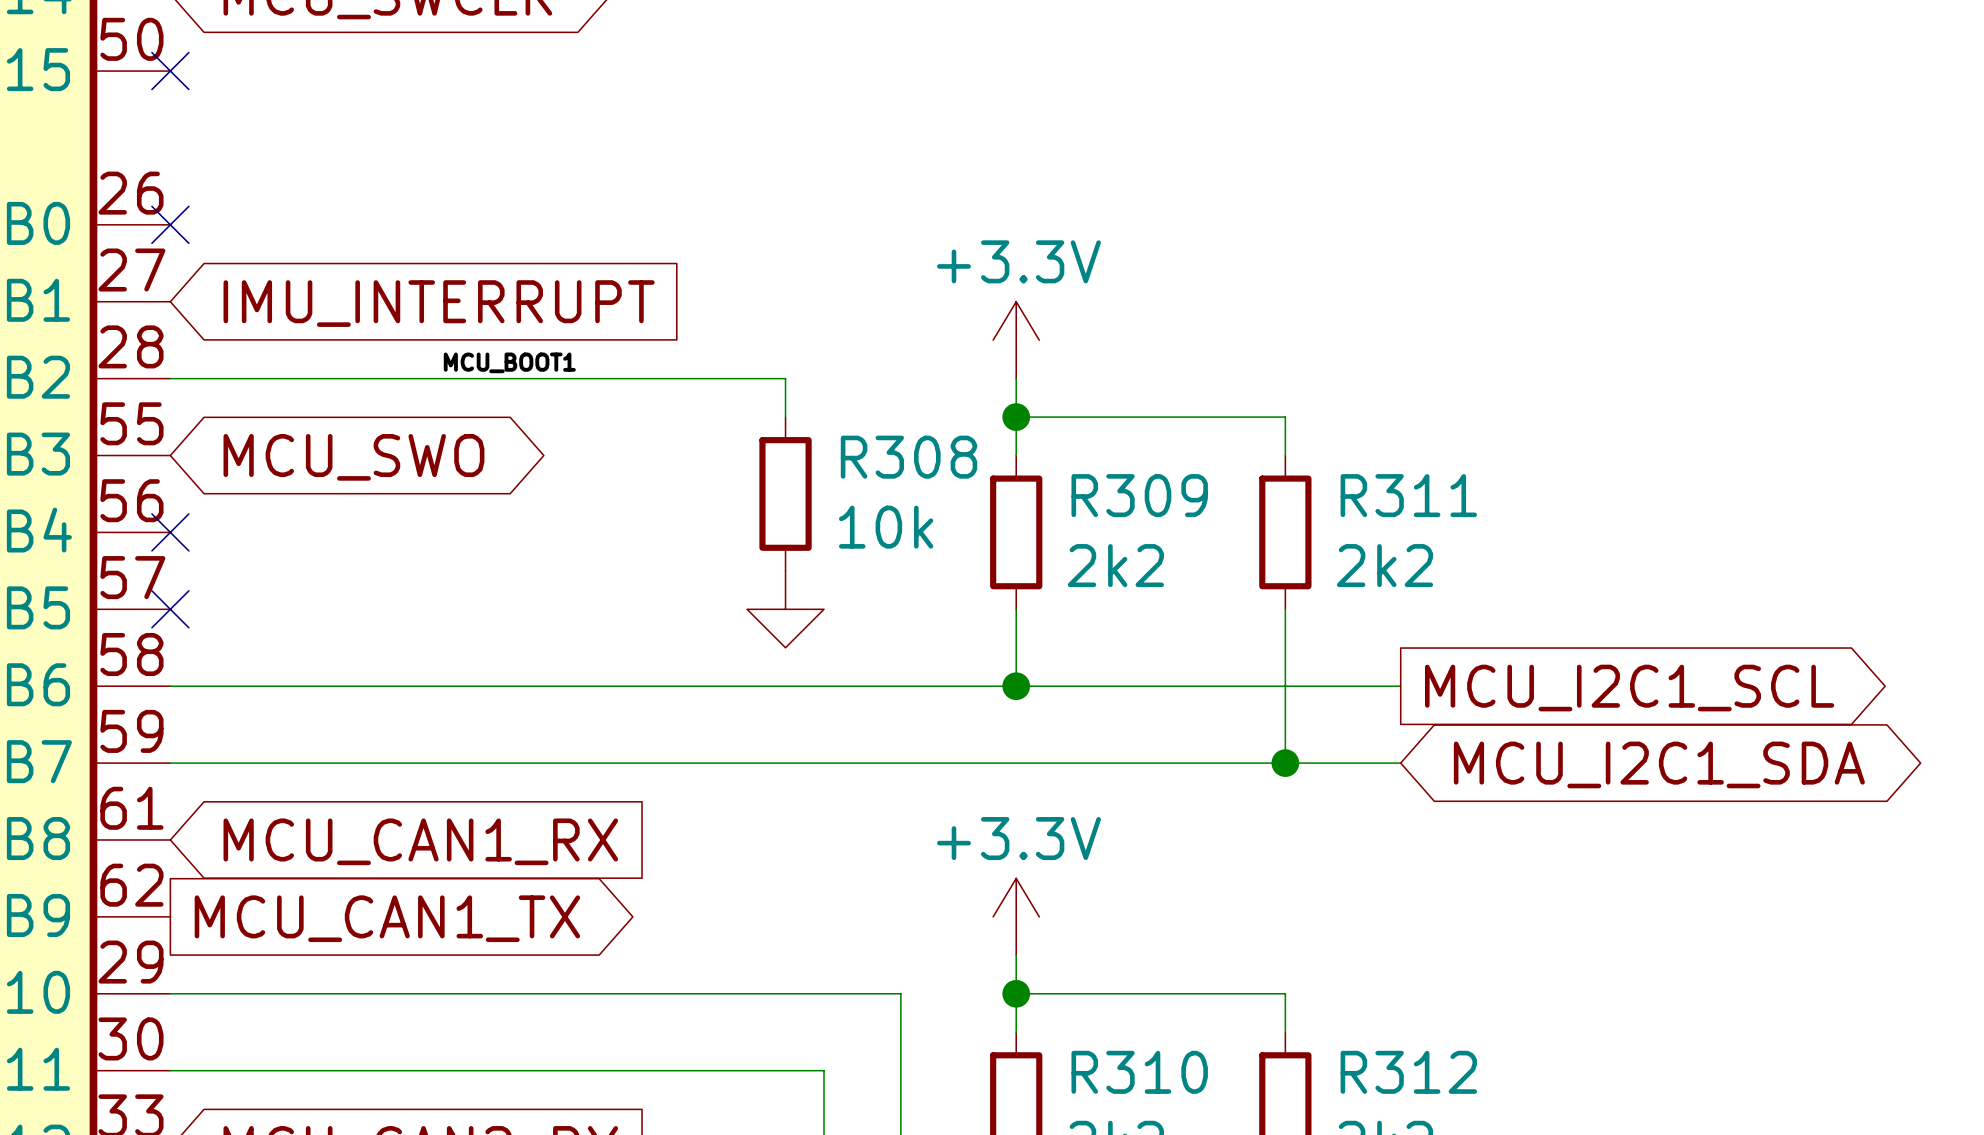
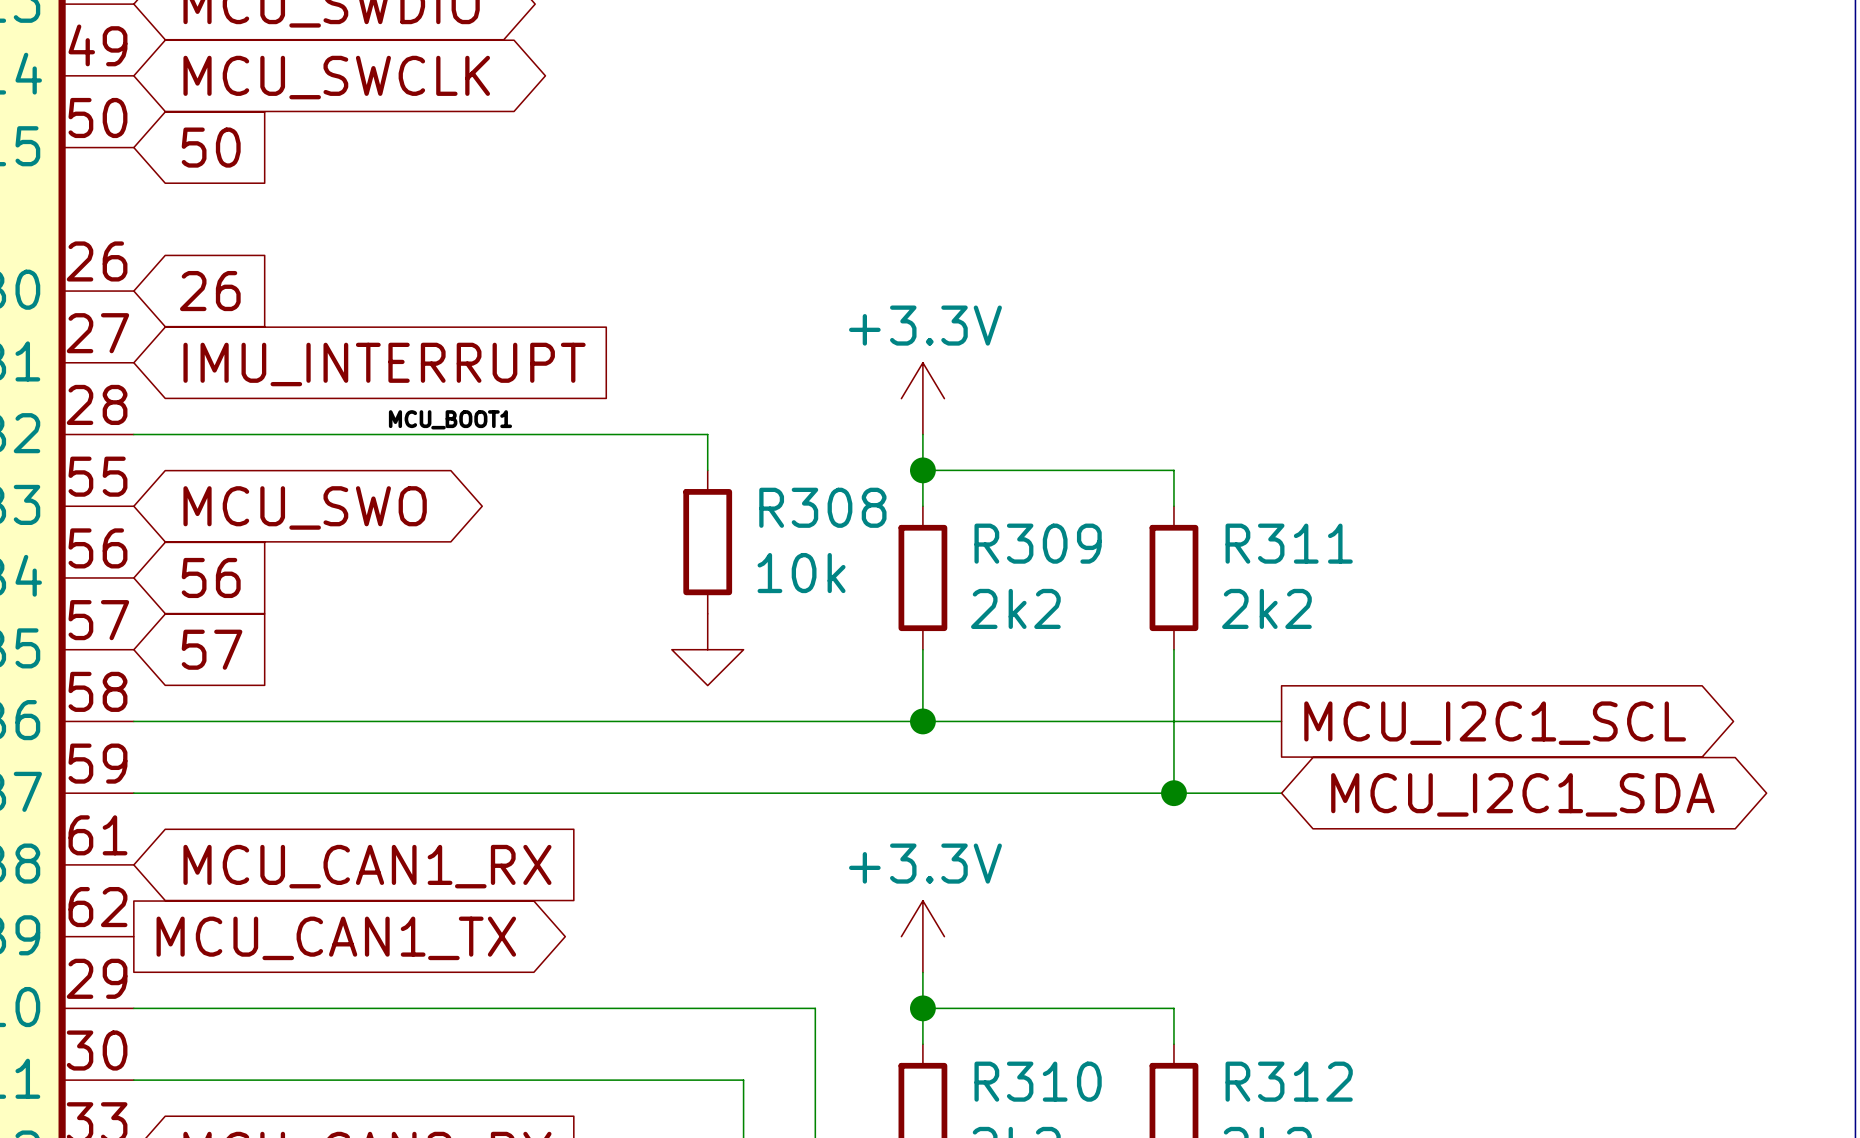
no-connect mark: (170, 71) -> none
global label: none -> 50 (211, 147)
no-connect mark: (170, 224) -> none
global label: none -> 26 (210, 291)
no-connect mark: (170, 532) -> none
global label: none -> 56 (211, 577)
no-connect mark: (170, 609) -> none
global label: none -> 57 (212, 649)

